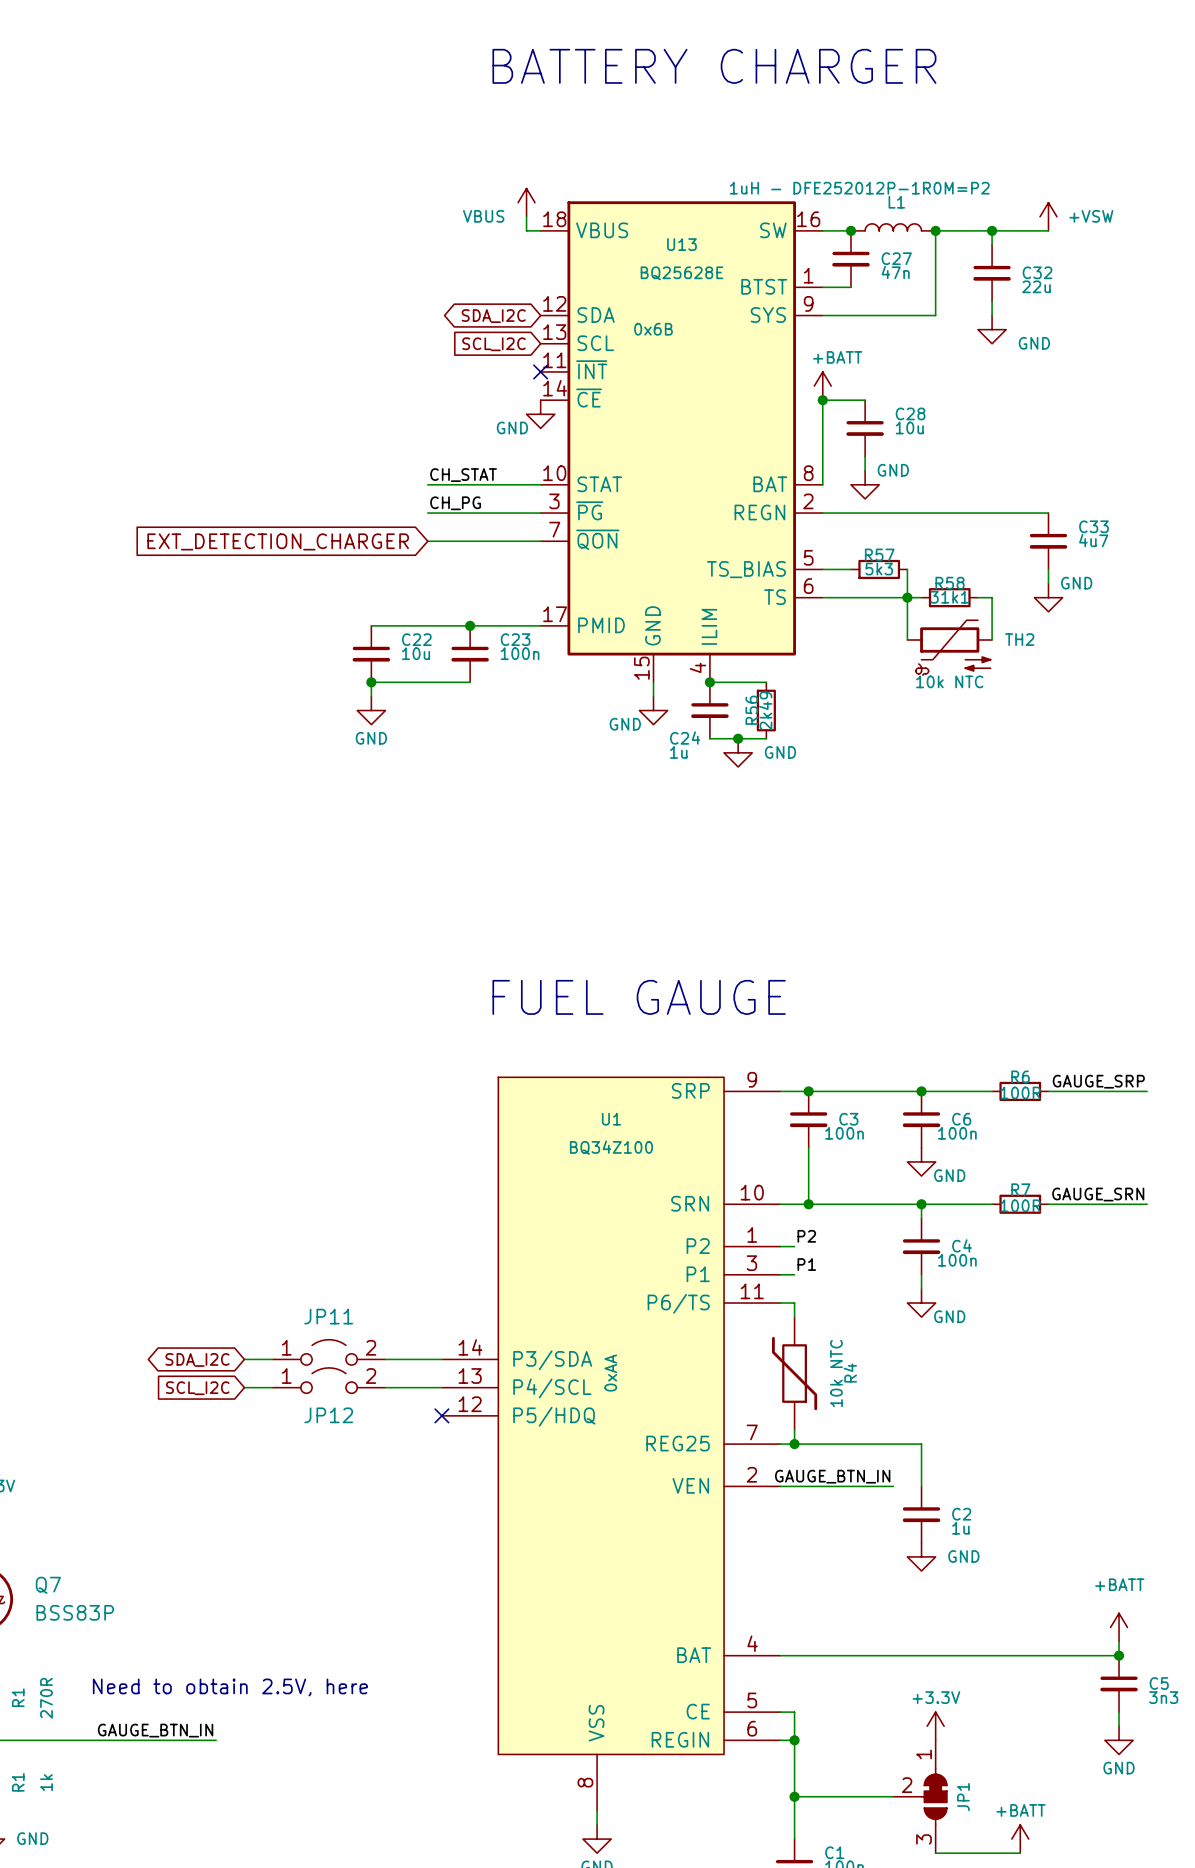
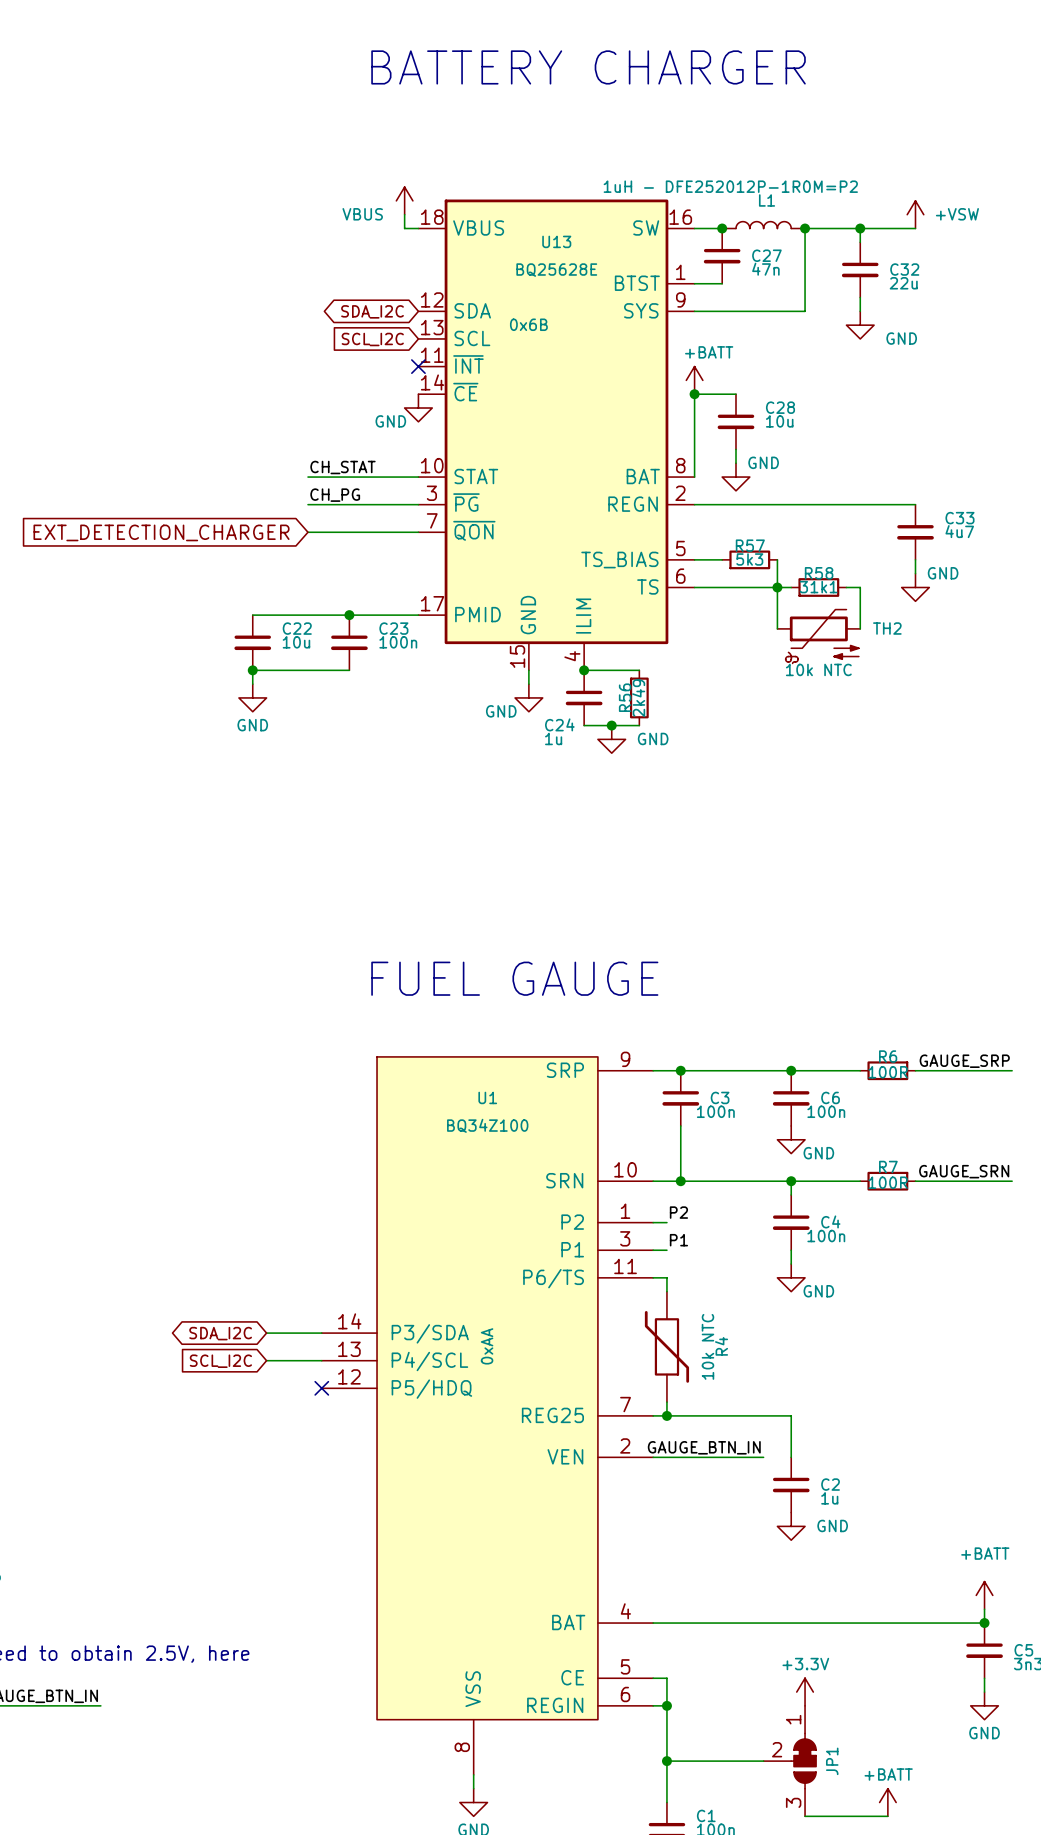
JP11: (329, 1352) -> none
global label position: SDA_I2C (197, 1359) -> SDA_I2C (220, 1333)
wire: (244, 1359) (272, 1359) -> none
JP12: (329, 1380) -> none
wire: (244, 1387) (272, 1387) -> none
global label position: SCL_I2C (197, 1388) -> SCL_I2C (220, 1361)

